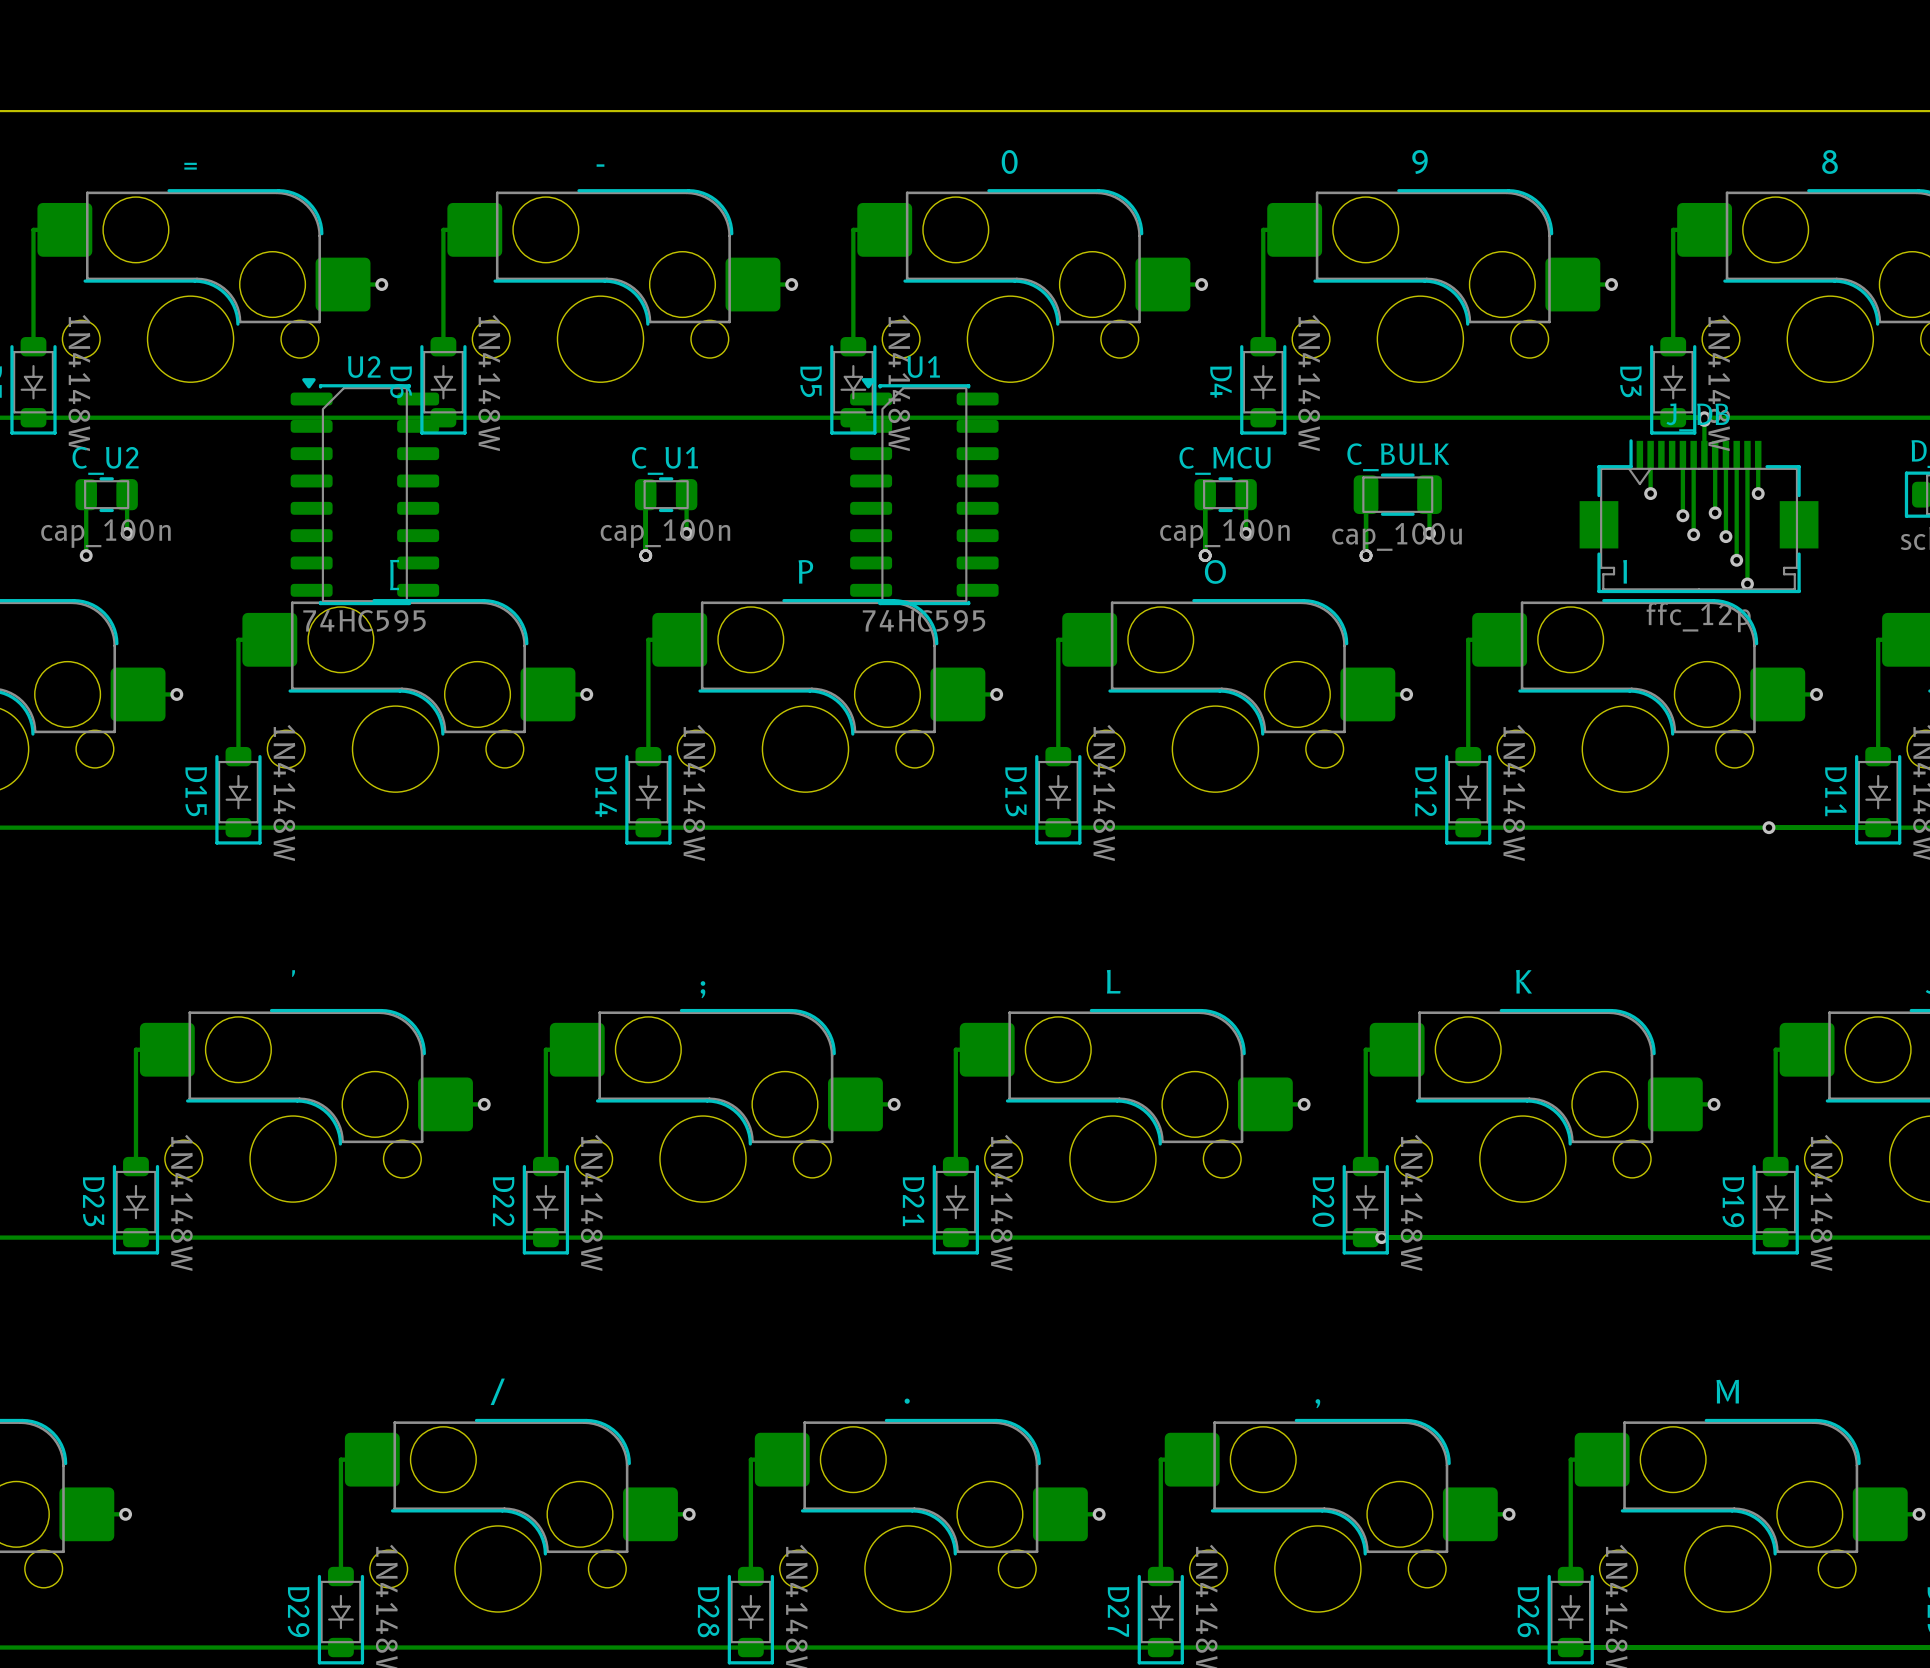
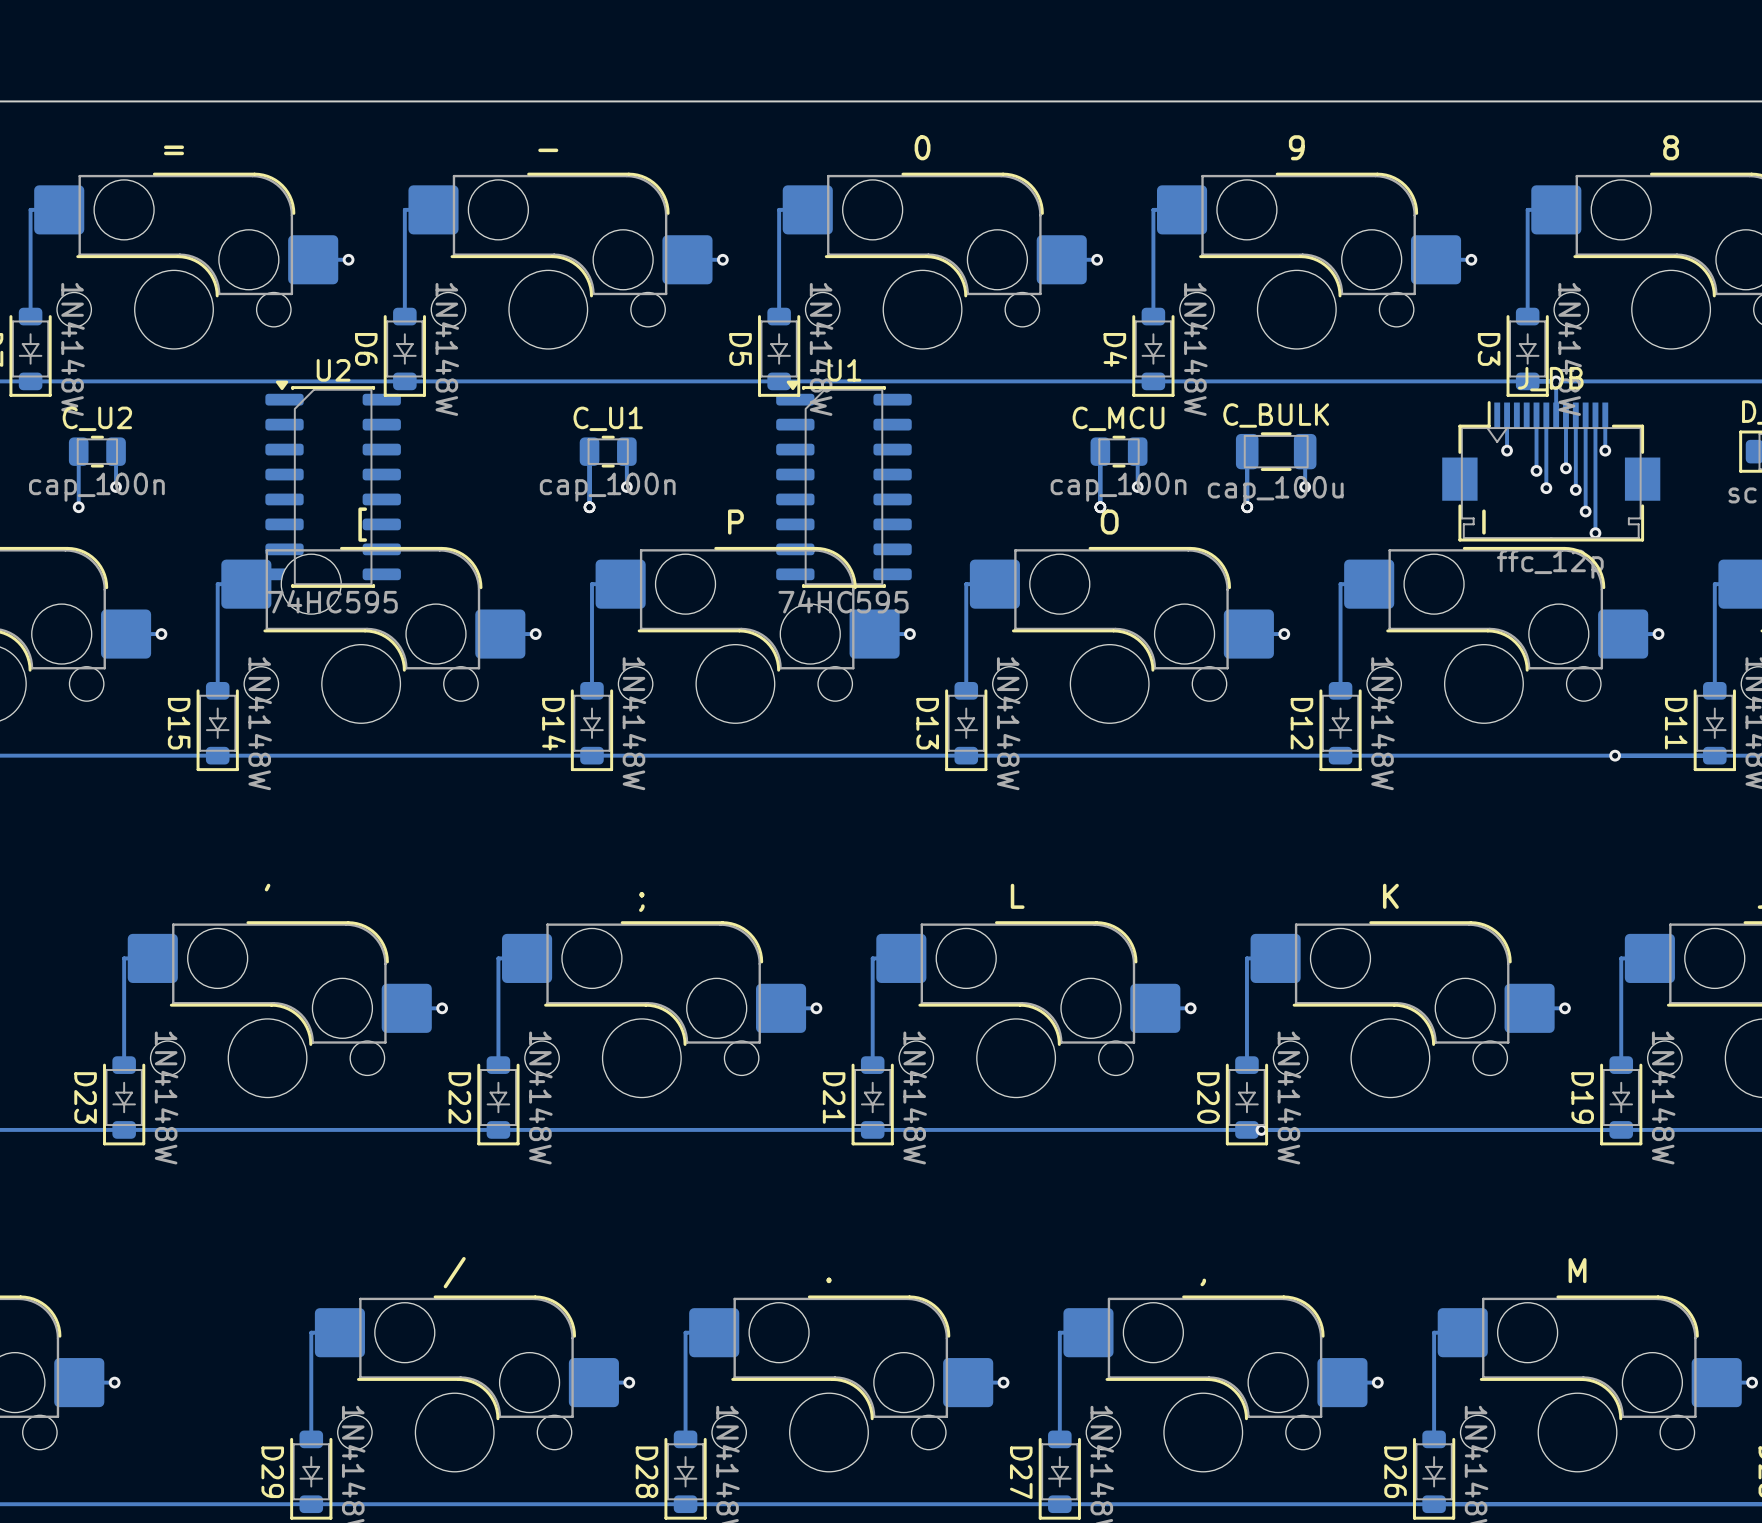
U2 position: (364, 491) -> (333, 484)
U1 position: (924, 491) -> (843, 484)

